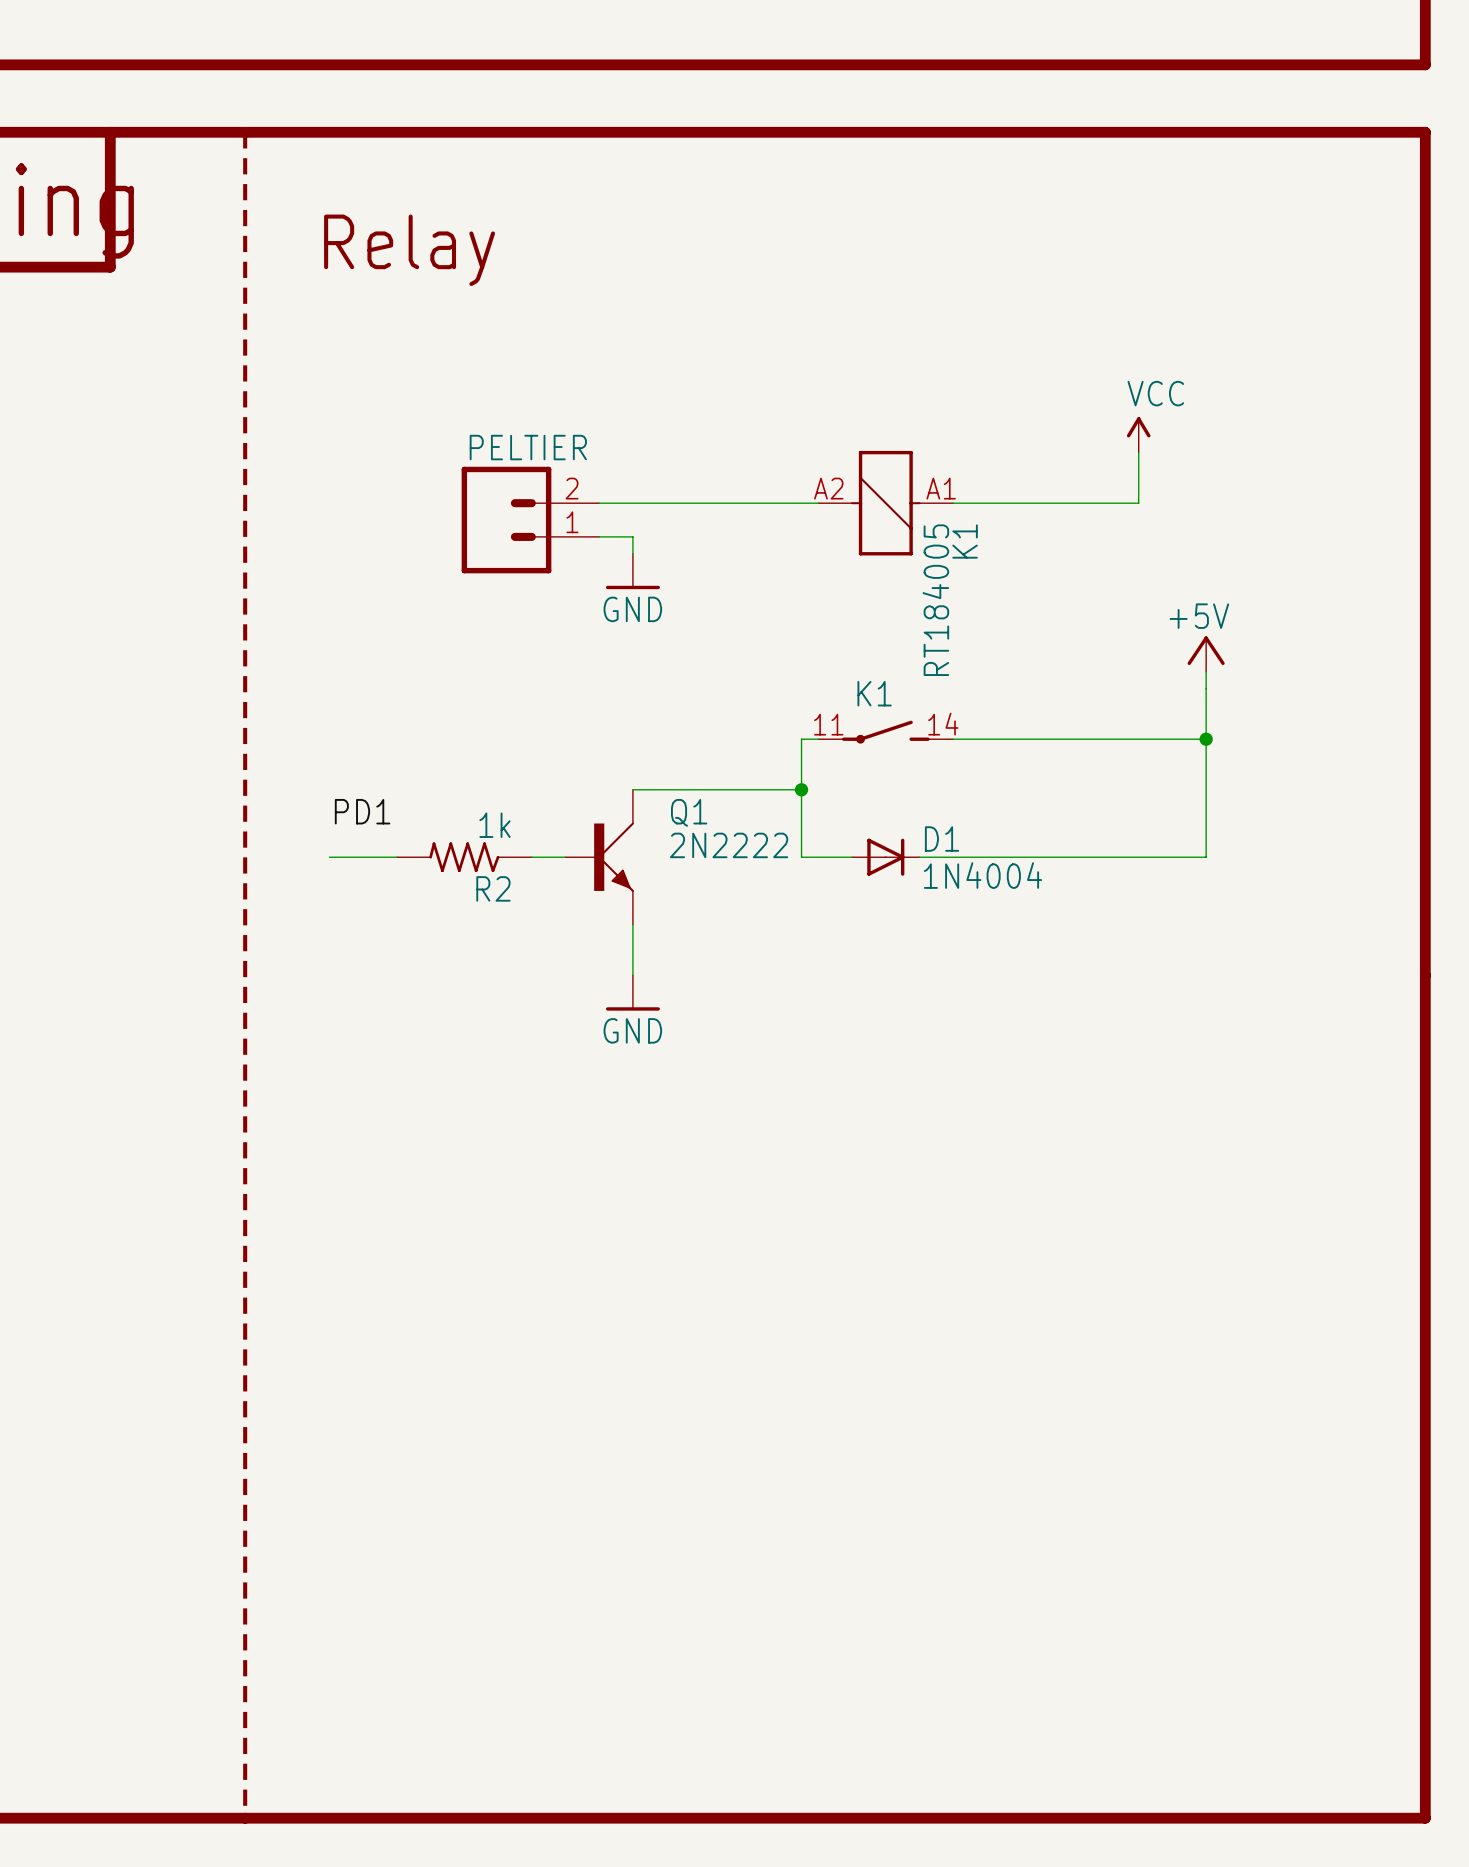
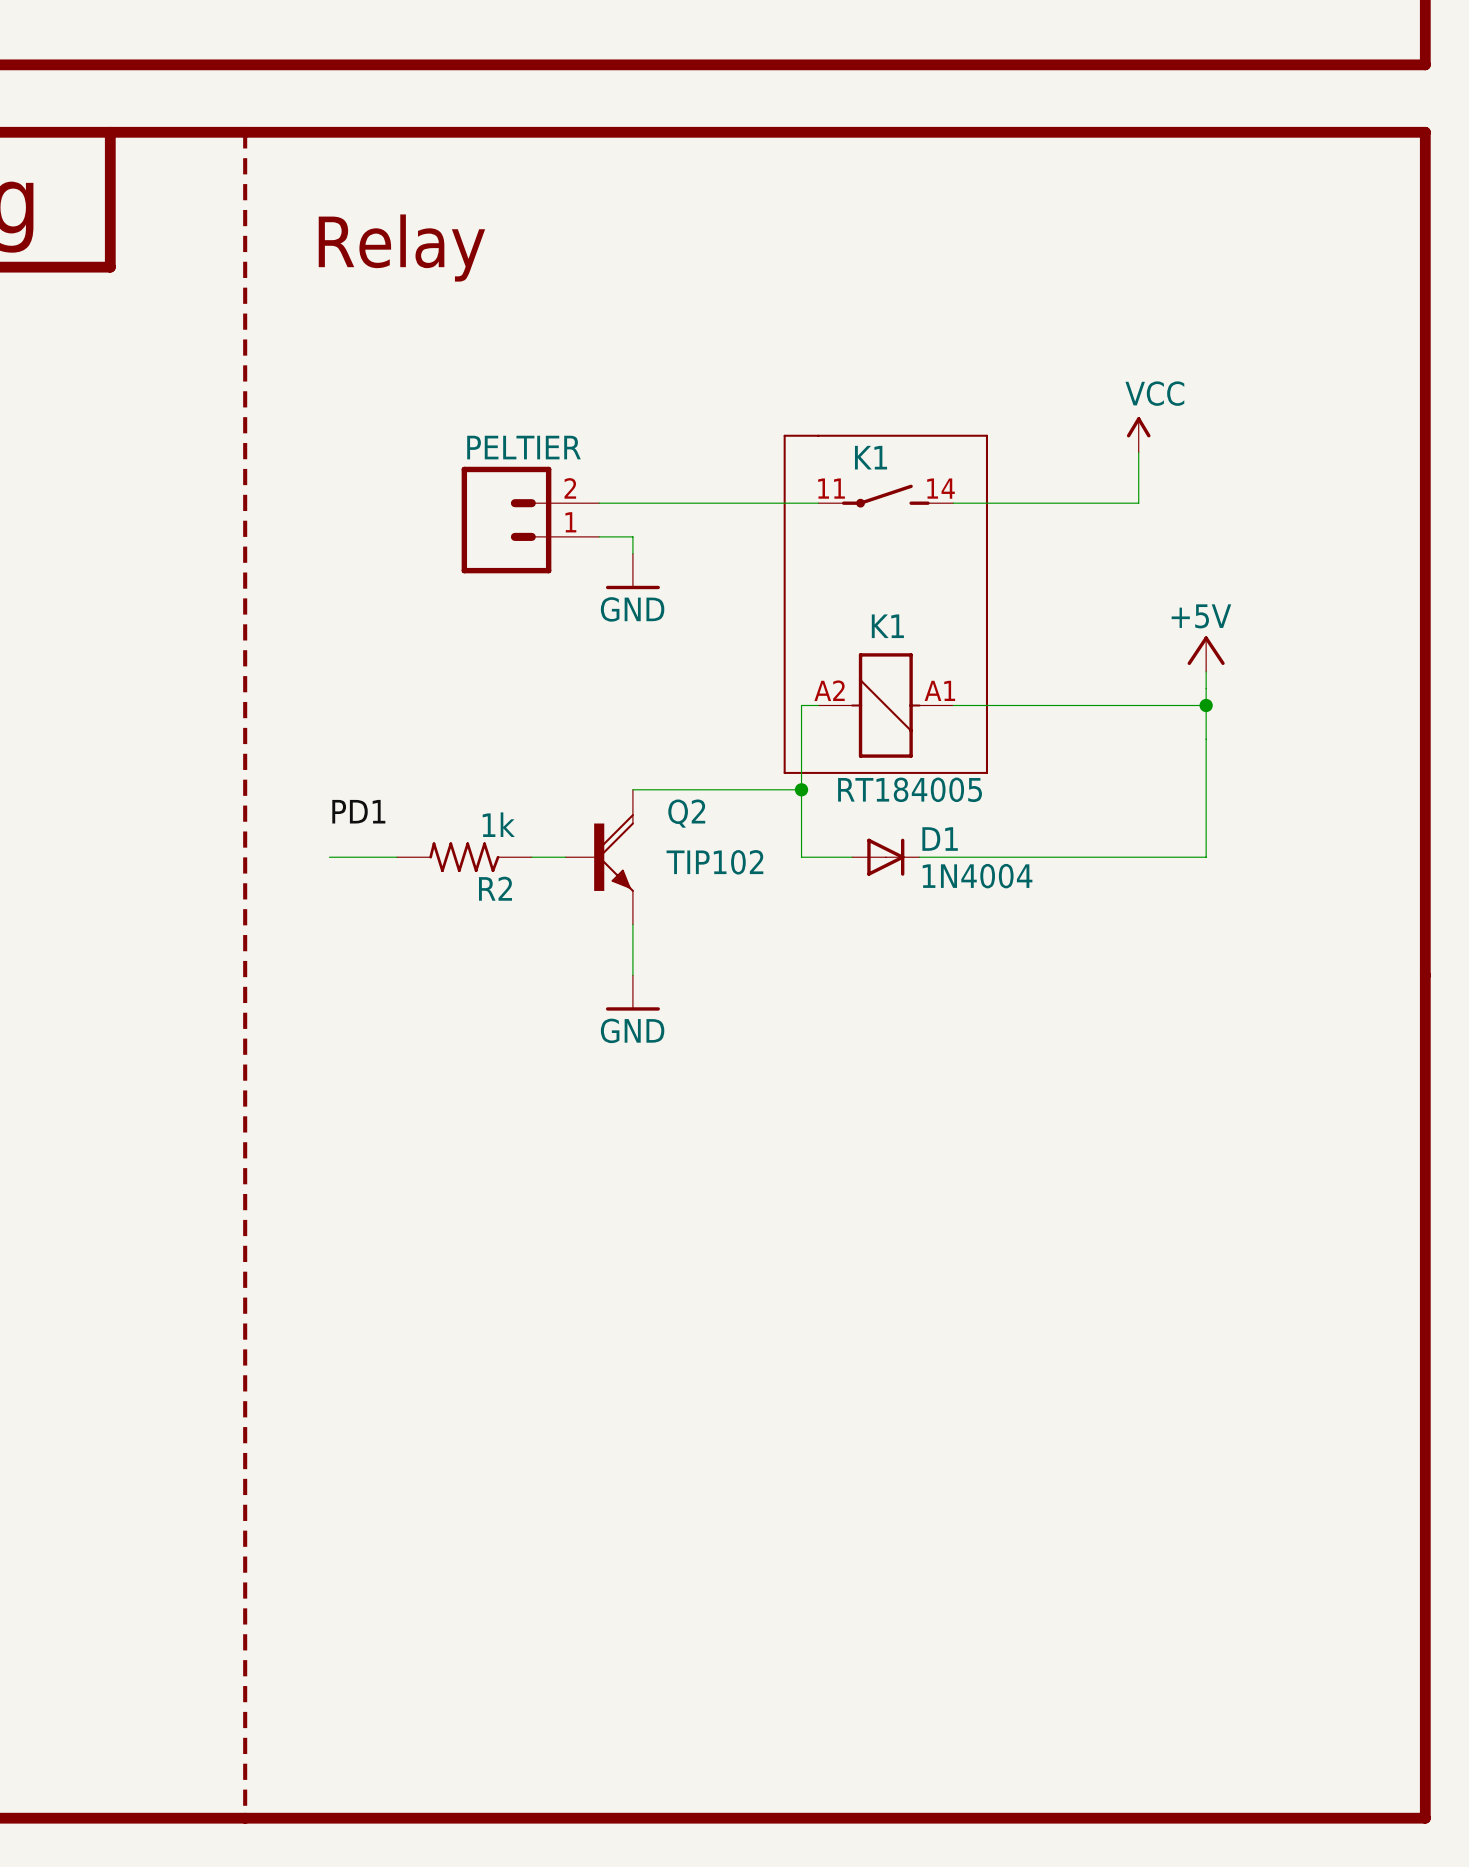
line: none -> (784, 435) (986, 435) (986, 772) (784, 772) (784, 435)
K1 symbol: [818, 450, 954, 556] -> [818, 484, 954, 508]
K1 name position: K1 (965, 541) -> K1 (871, 457)
K1 value: RT184005 (935, 600) -> none
K1: none -> RT184005 (885, 705)
K1: (885, 732) -> none
wire: (801, 739) (818, 739) -> (801, 739) (801, 705) (818, 705)
wire: (953, 739) (1206, 739) -> (953, 705) (1206, 705)
junction position: (1206, 739) -> (1206, 705)
Q1: 2N2222 (599, 857) -> none
Q2: none -> (599, 857)
text: none -> TIP102 (714, 862)

